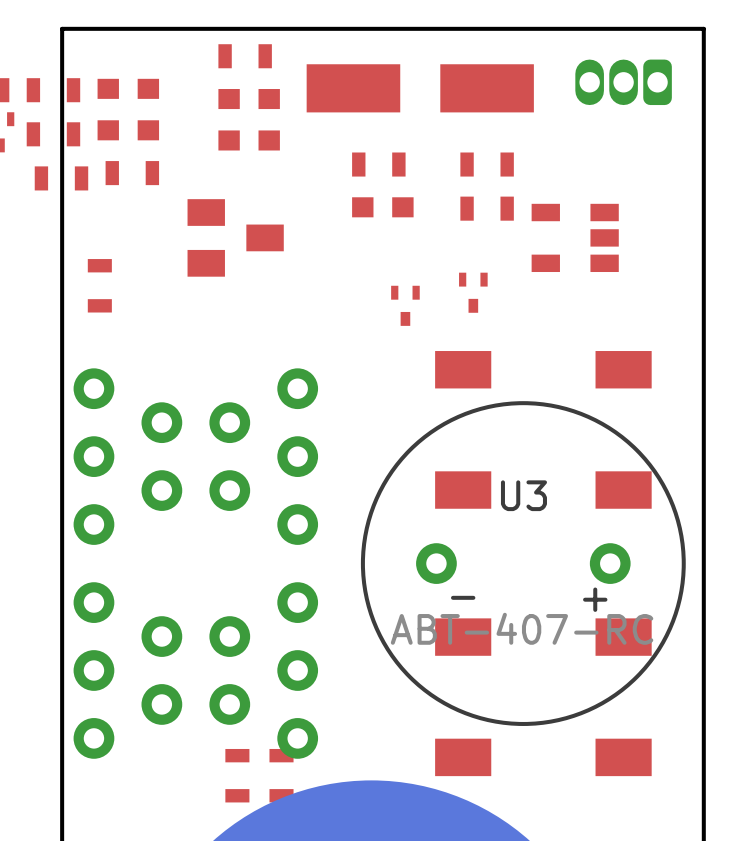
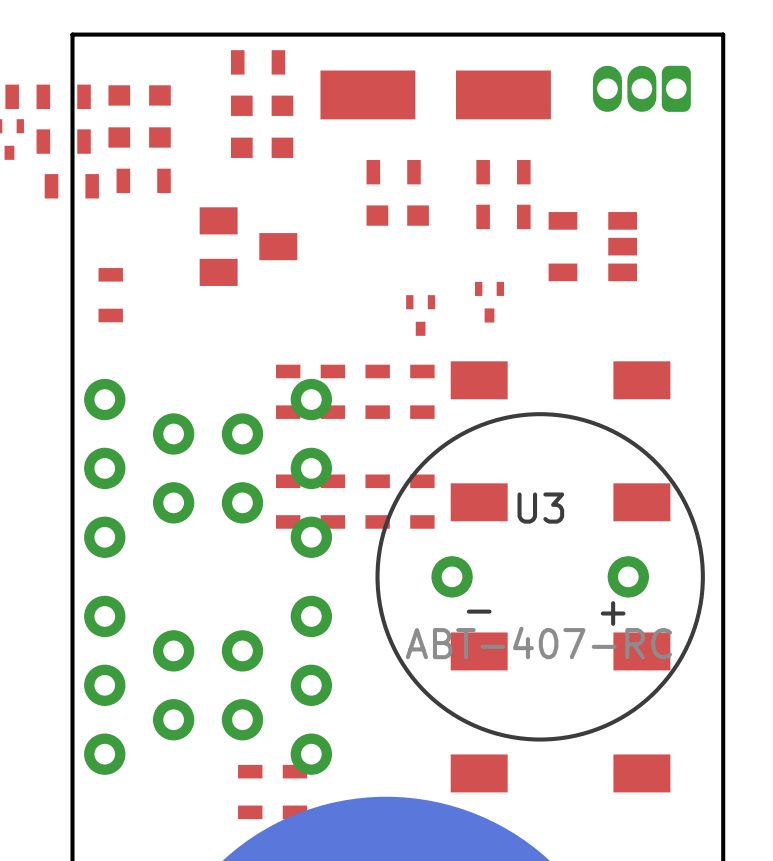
part: none -> (288, 391)
part: none -> (332, 391)
part: none -> (377, 391)
part: none -> (422, 391)
part: none -> (288, 501)
part: none -> (332, 501)
part: none -> (377, 501)
part: none -> (422, 501)

